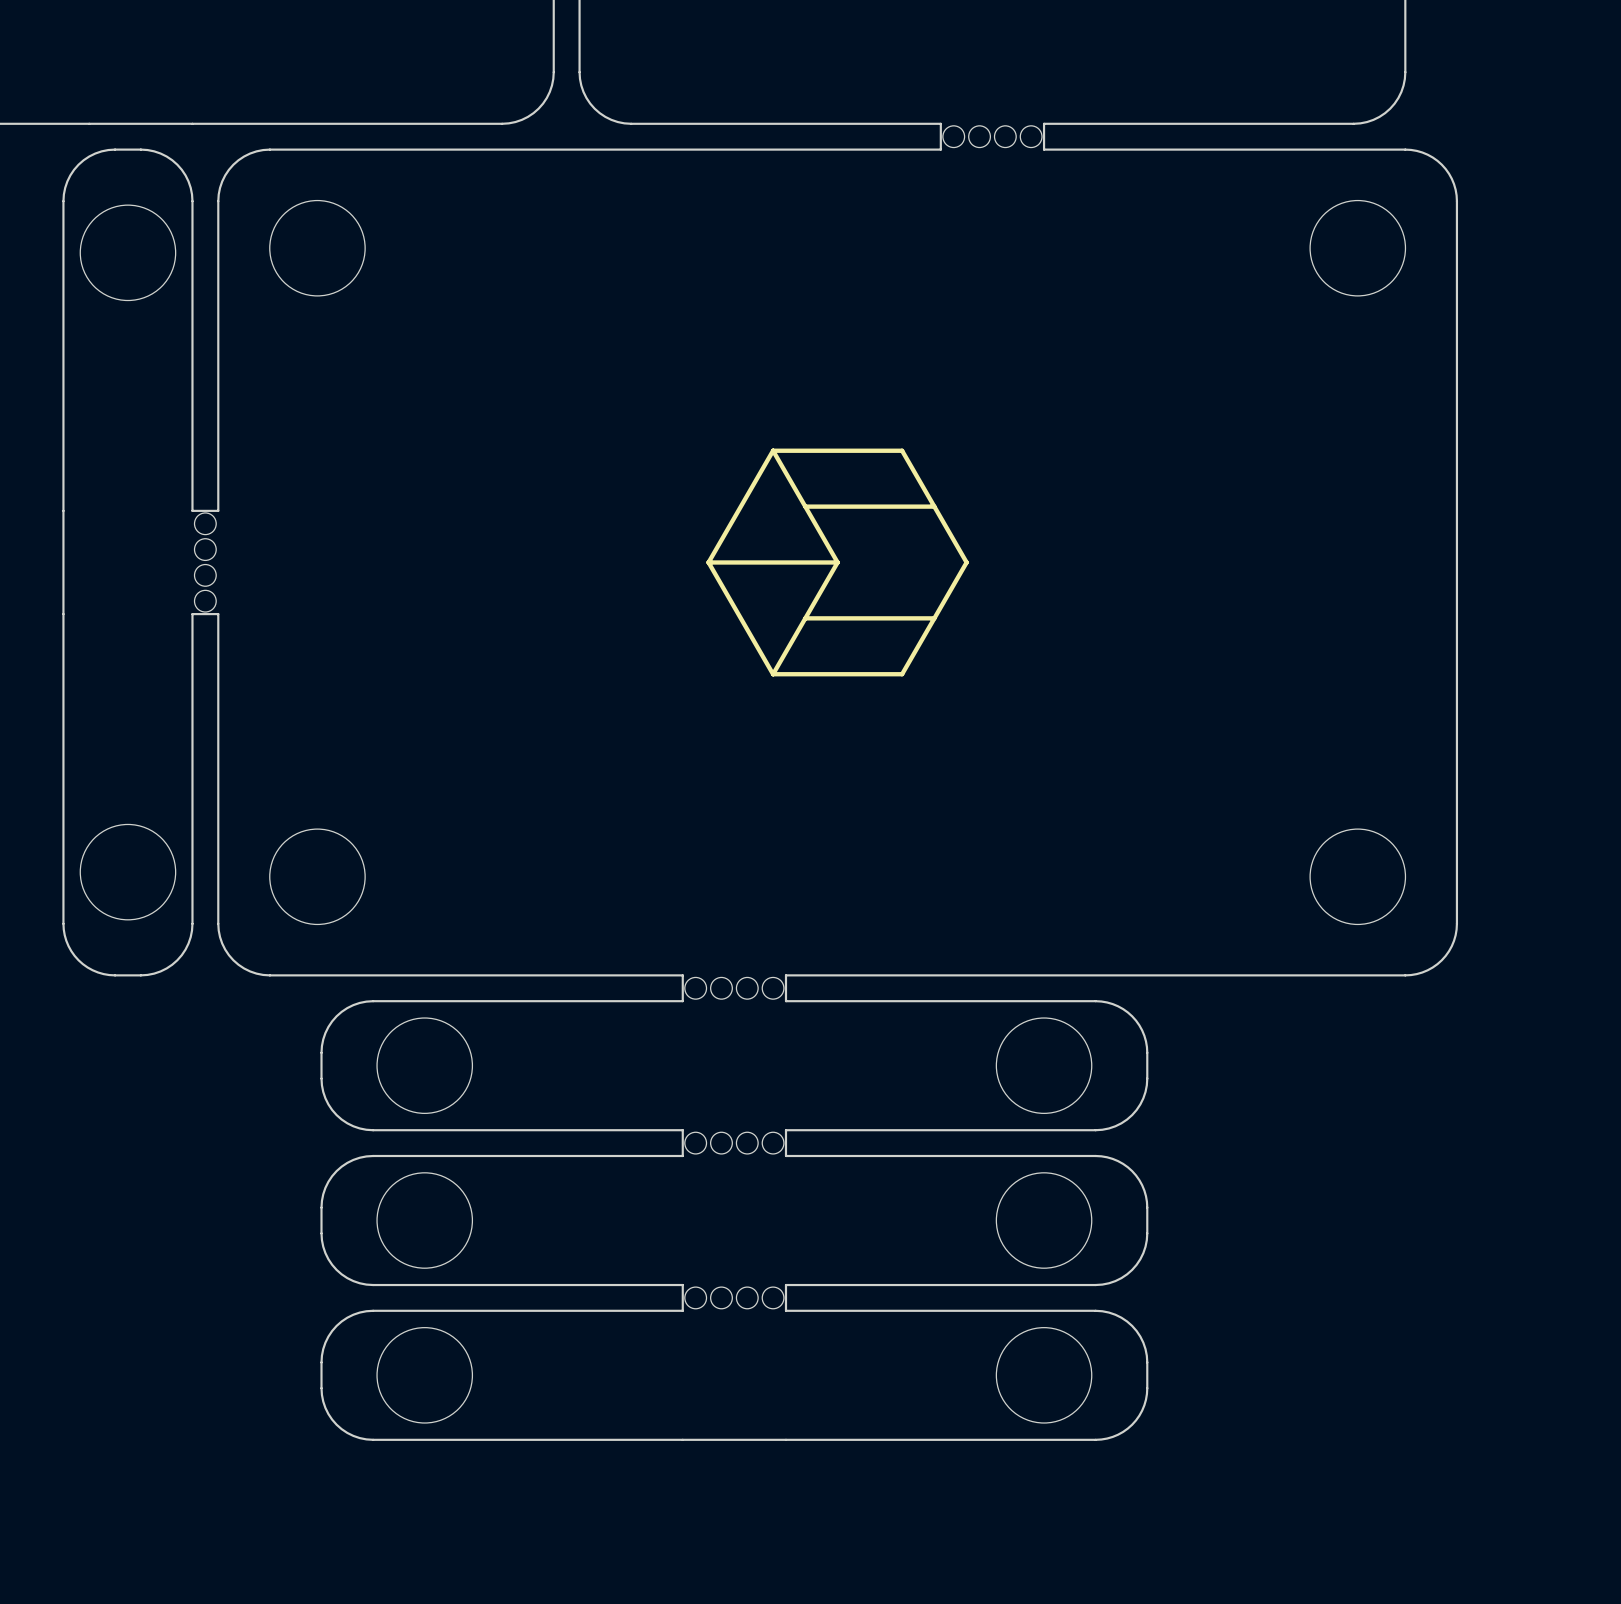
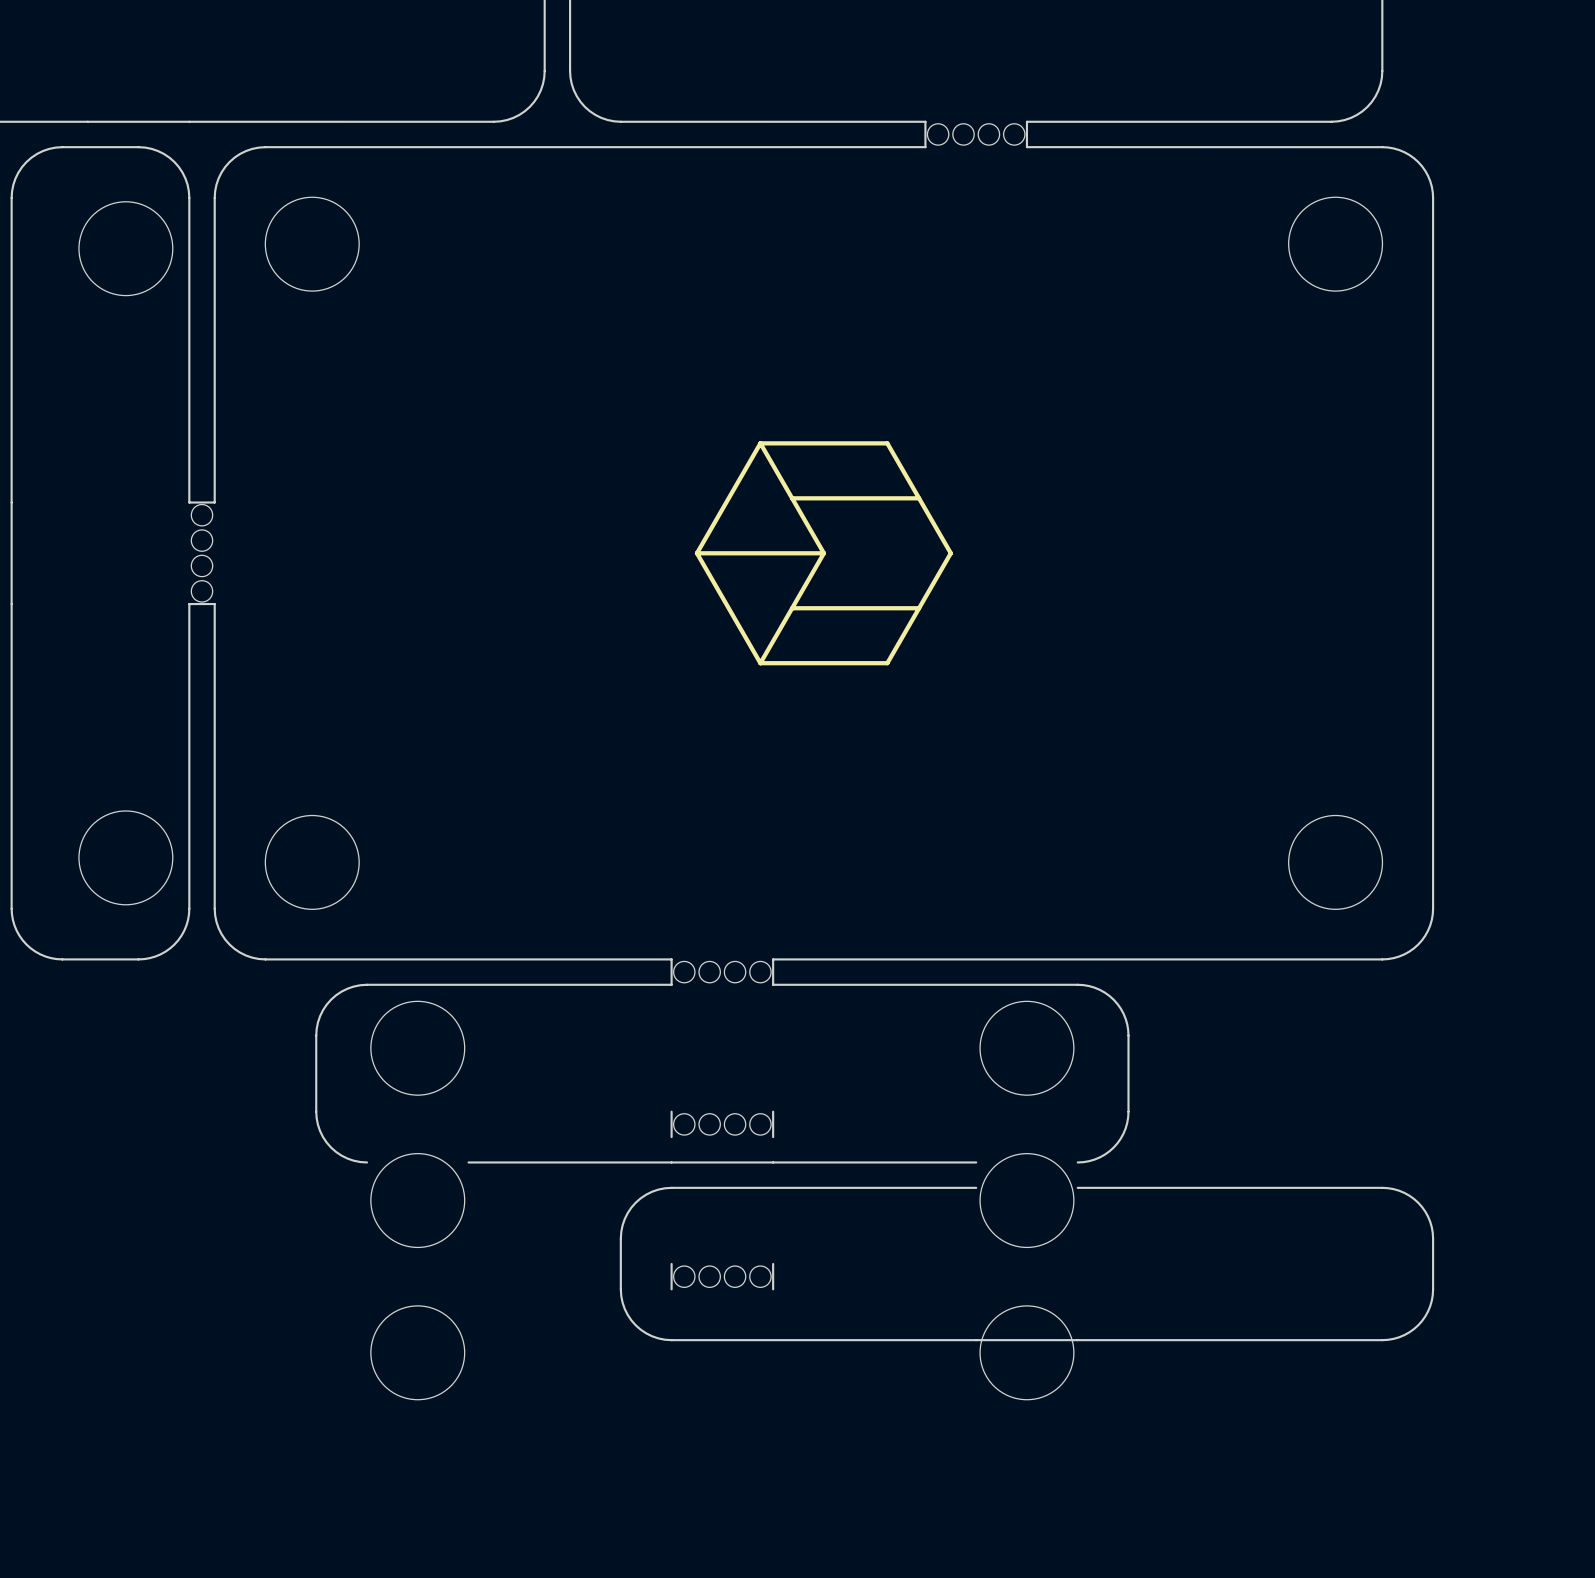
board edge: (140, 149) (108, 150) (89, 156) (74, 169) (67, 181) (63, 194) (63, 929) (71, 951) (87, 967) (109, 975) (140, 975) (160, 971) (177, 960) (188, 943) (192, 923) -> (138, 147) (62, 147) (42, 151) (31, 157) (22, 167) (15, 178) (12, 191) (11, 914) (14, 925) (22, 940) (35, 951) (45, 956) (62, 959) (138, 959) (160, 954) (174, 944) (184, 930) (189, 908)
board edge: (1147, 1052) (1146, 1085) (1140, 1104) (1127, 1119) (1109, 1128) (1095, 1130) (786, 1130) -> (1128, 1035) (1128, 1111) (1125, 1128) (1117, 1143) (1104, 1154) (1089, 1161) (1077, 1162)
board edge: (321, 1078) (323, 1091) (332, 1110) (347, 1123) (366, 1129) (682, 1130) -> (316, 1060) (316, 1118) (323, 1137) (331, 1147) (341, 1155) (353, 1160) (367, 1162)
board edge: (373, 1155) (353, 1159) (336, 1171) (325, 1187) (321, 1200) (321, 1240) (325, 1253) (336, 1269) (353, 1281) (373, 1285) (682, 1285) -> none
board edge: (786, 1155) (1107, 1157) (1127, 1167) (1142, 1185) (1146, 1201) (1147, 1233) (1143, 1253) (1132, 1269) (1121, 1278) (1102, 1284) (786, 1285) -> none
board edge: (373, 1156) (682, 1155) -> none
board edge: none -> (468, 1162) (976, 1162)
board edge: none -> (976, 1187) (671, 1187) (658, 1189) (646, 1194) (635, 1202) (627, 1213) (622, 1225) (620, 1238) (622, 1302) (627, 1314) (640, 1329) (658, 1338) (671, 1340) (1382, 1340) (1399, 1337) (1413, 1329) (1425, 1316) (1430, 1306) (1433, 1289) (1431, 1227) (1428, 1216) (1418, 1202) (1399, 1190) (1382, 1187) (1077, 1187)
board edge: (682, 1310) (373, 1310) (359, 1312) (341, 1321) (332, 1331) (325, 1342) (321, 1362) (323, 1401) (332, 1419) (341, 1429) (359, 1438) (373, 1439) (1095, 1439) (1112, 1436) (1127, 1428) (1139, 1415) (1145, 1399) (1147, 1362) (1143, 1342) (1132, 1325) (1121, 1317) (1109, 1312) (1095, 1310) (786, 1310) -> none

